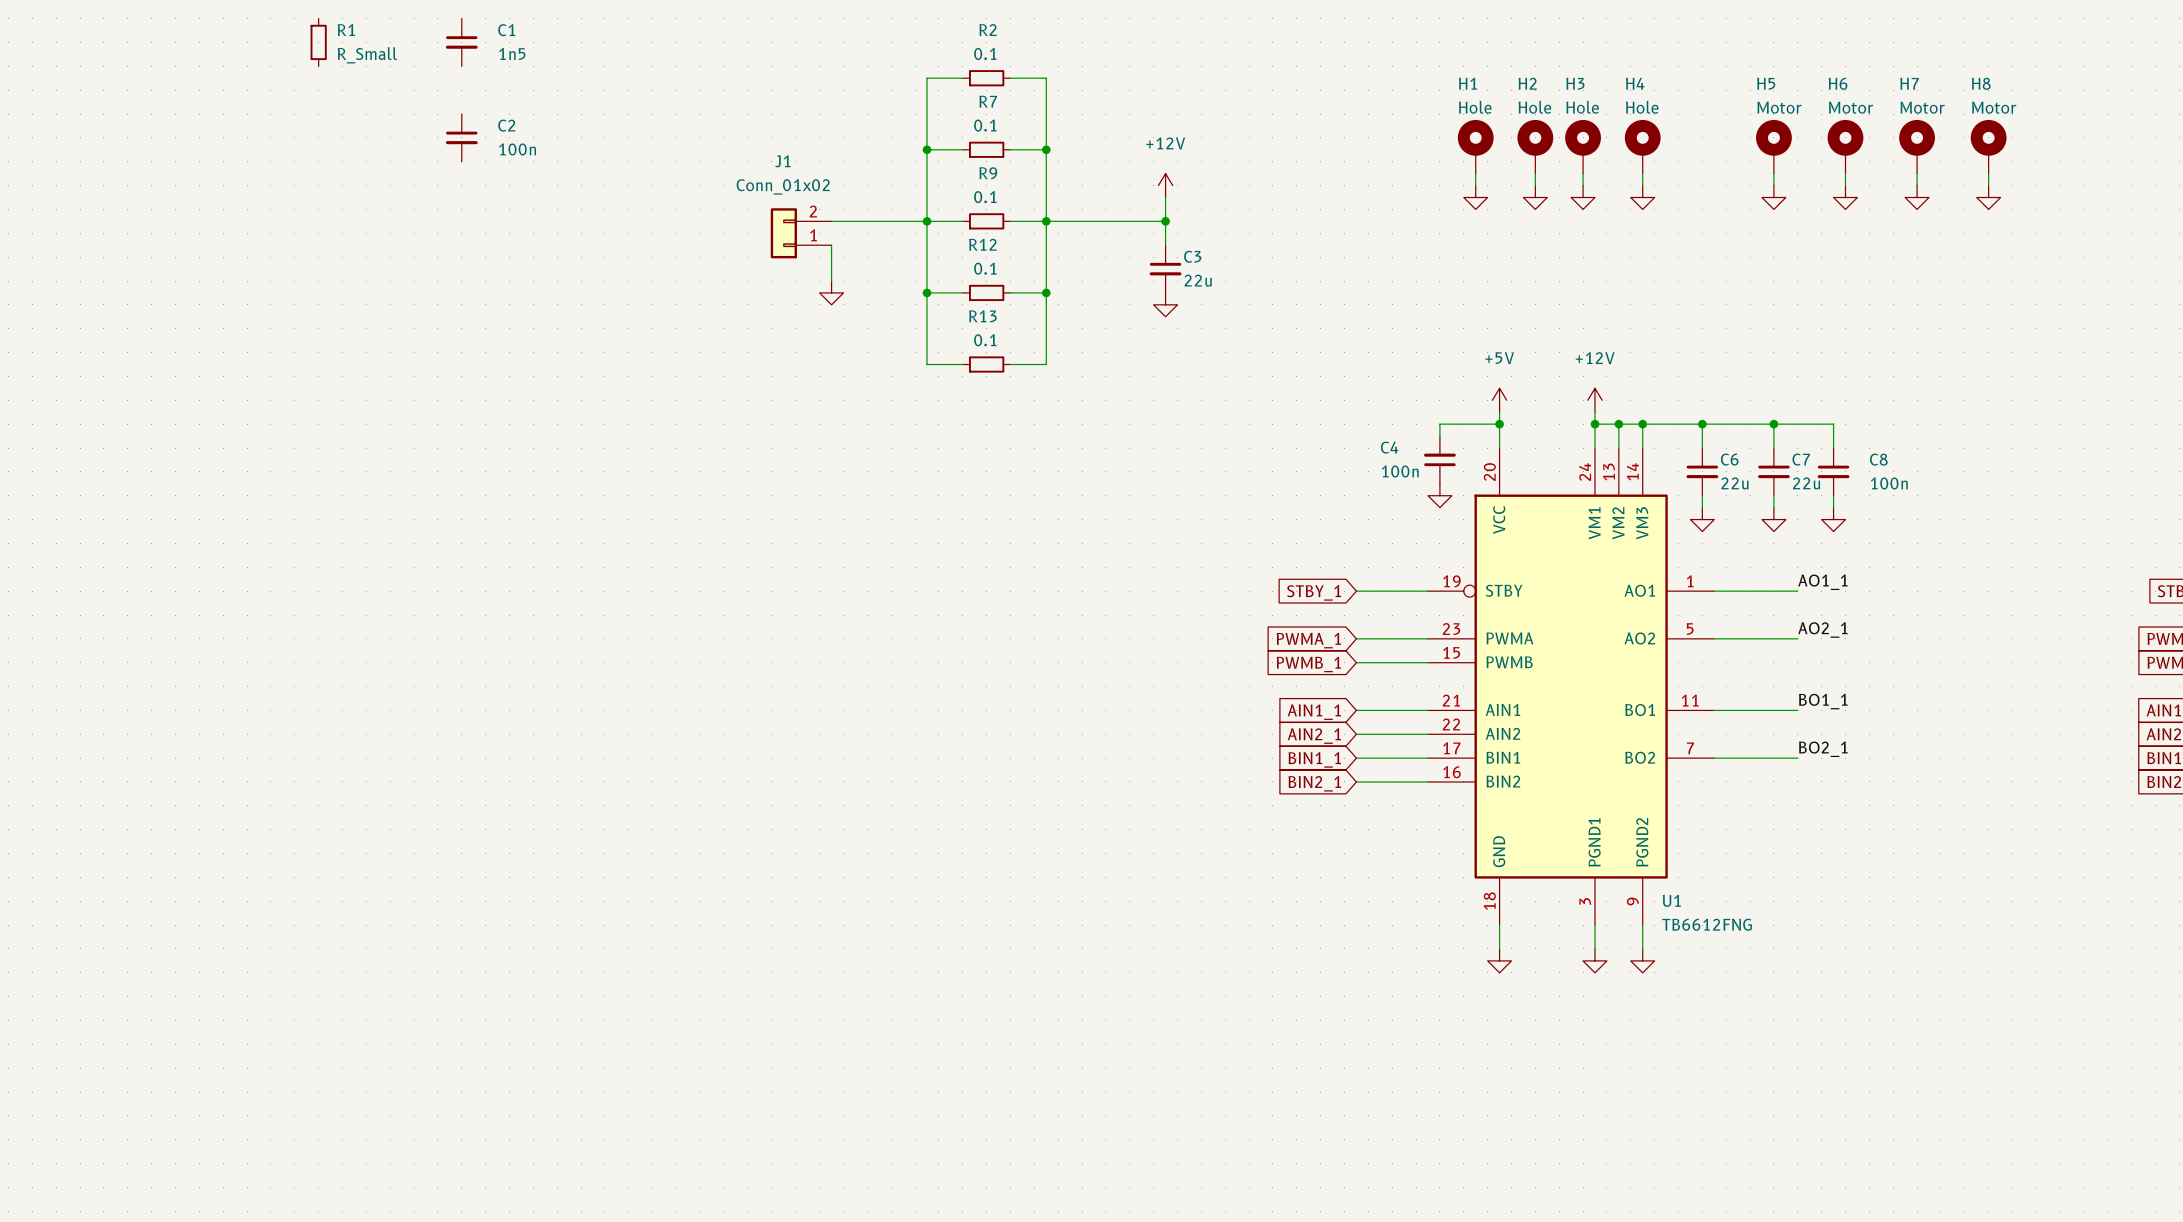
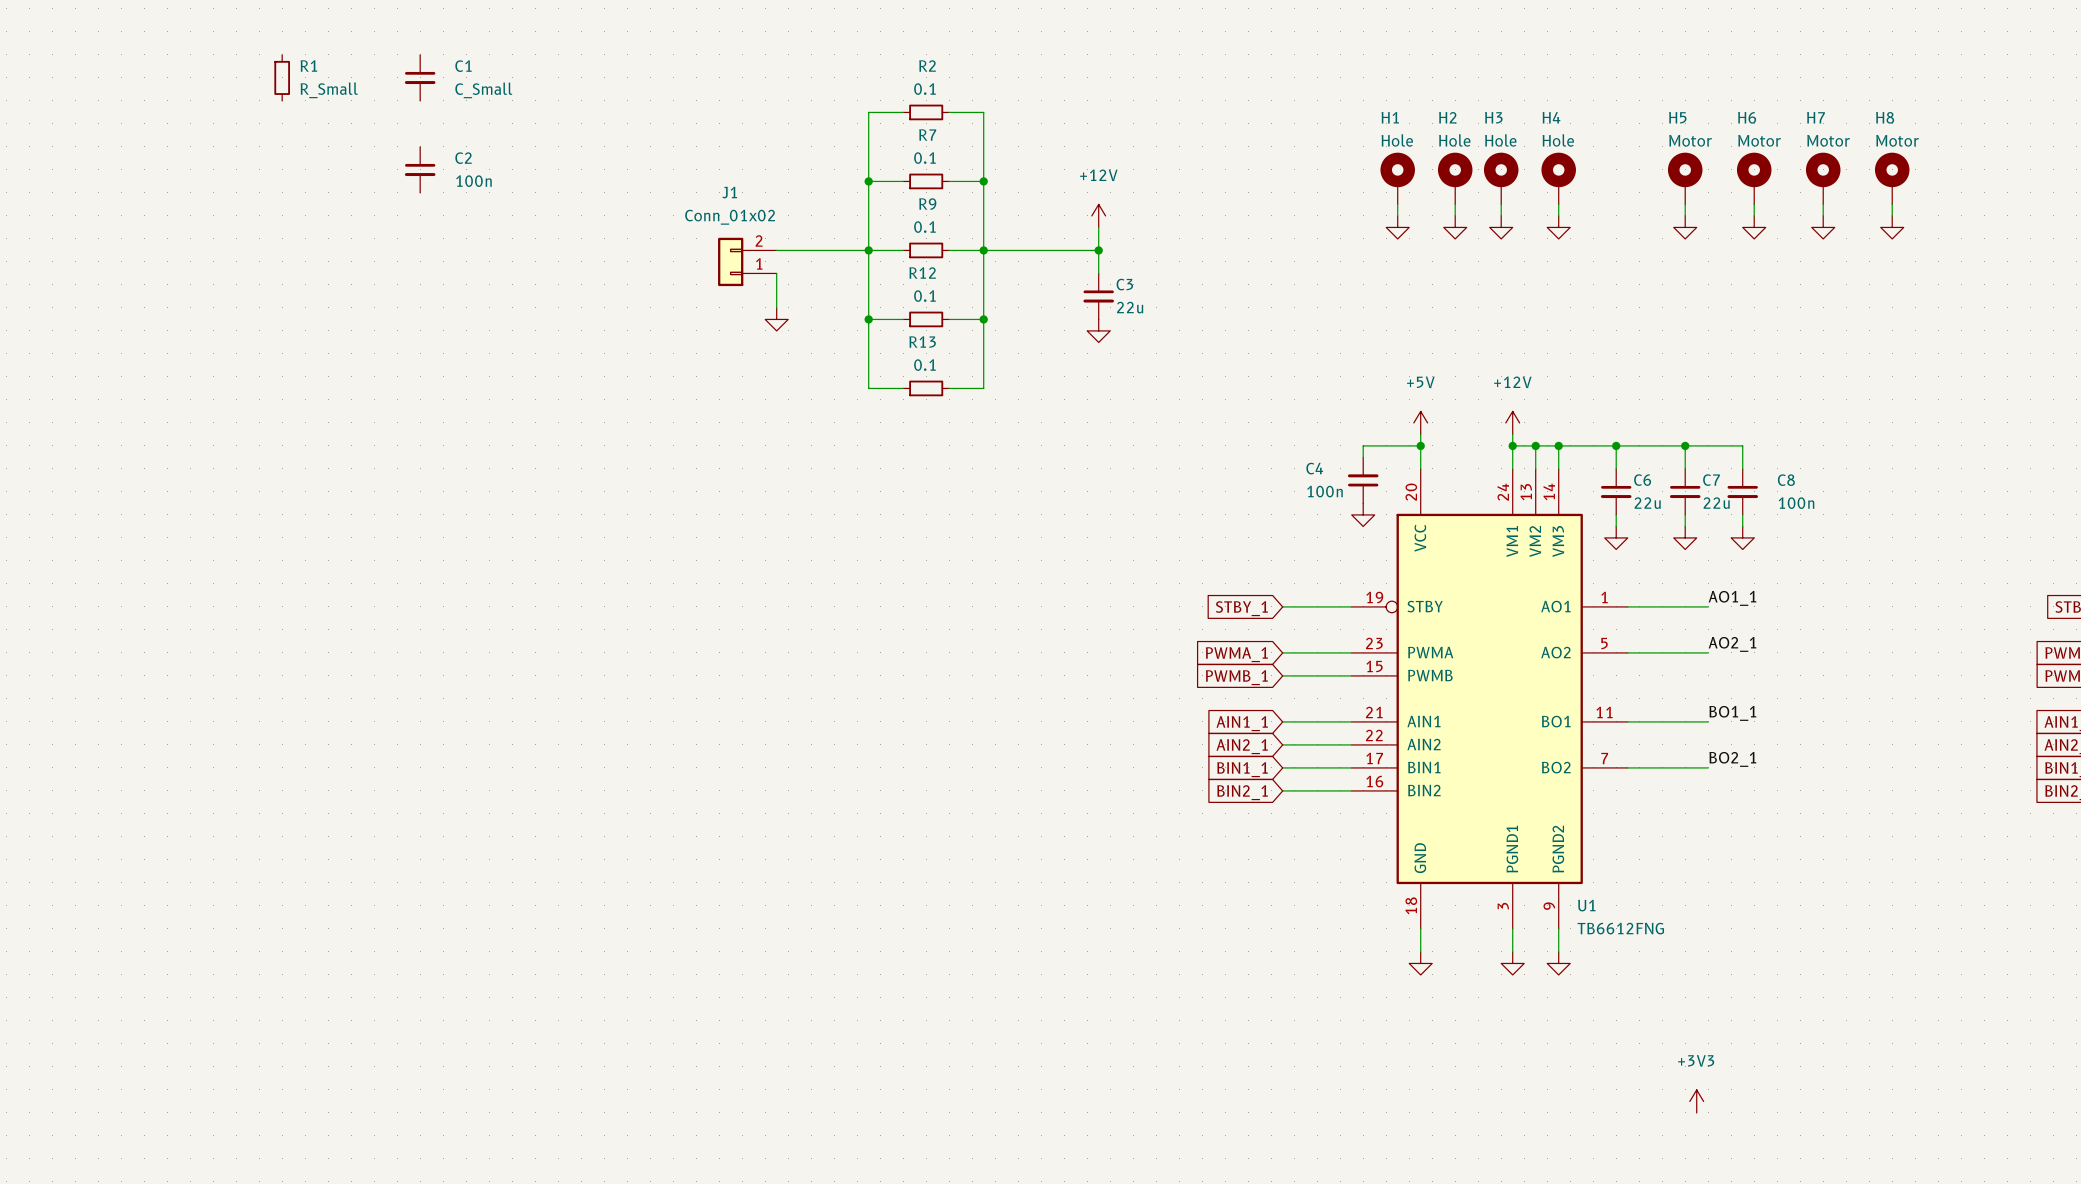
C1 value: 1n5 (512, 53) -> C_Small (483, 90)
power symbol: none -> +3V3 (1696, 1101)

